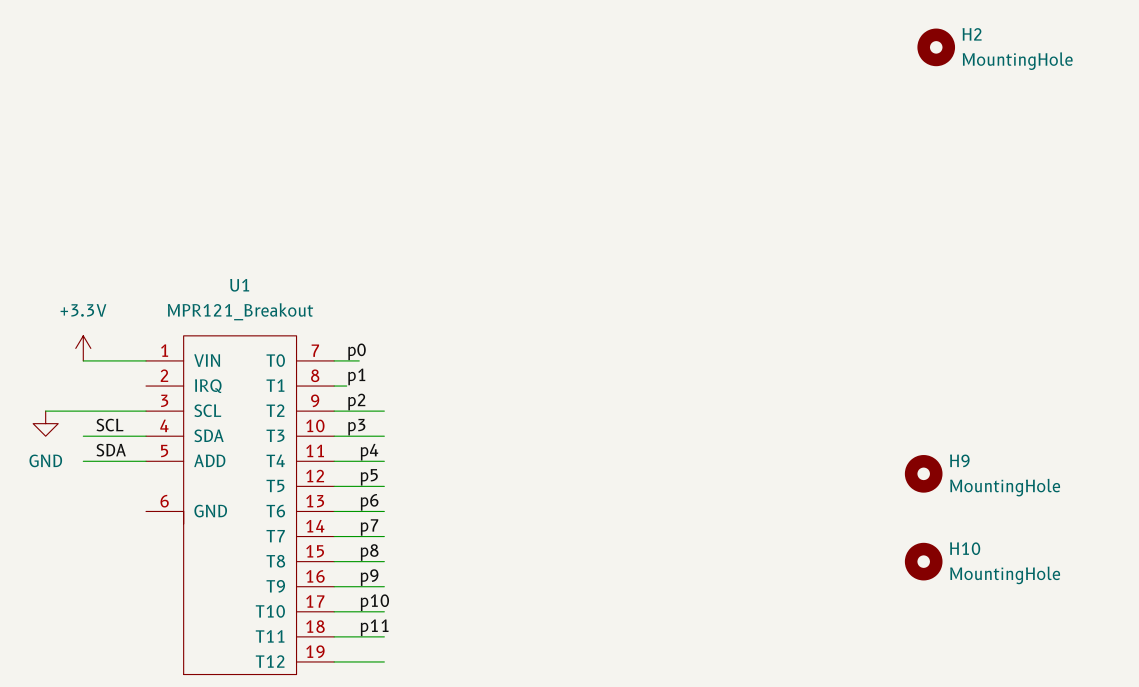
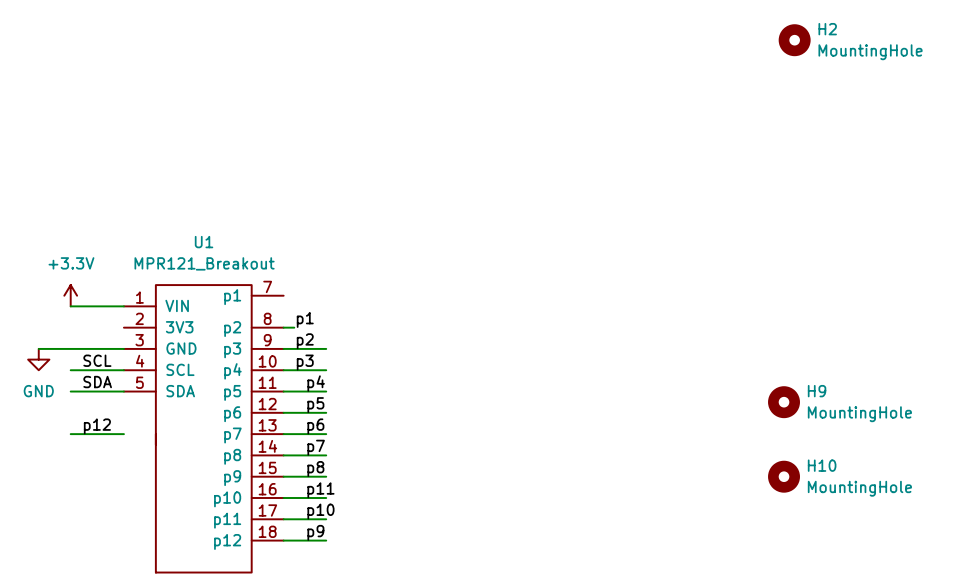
U1 symbol: [146, 335, 335, 675] -> [123, 285, 284, 573]
label: p0 (357, 351) -> none
wire: (334, 360) (359, 360) -> none
label: none -> p12 (97, 426)
wire: none -> (70, 434) (123, 434)
label: p9 (369, 577) -> p11 (320, 490)
label: p11 (374, 627) -> p9 (315, 532)
wire: (334, 661) (384, 661) -> none

